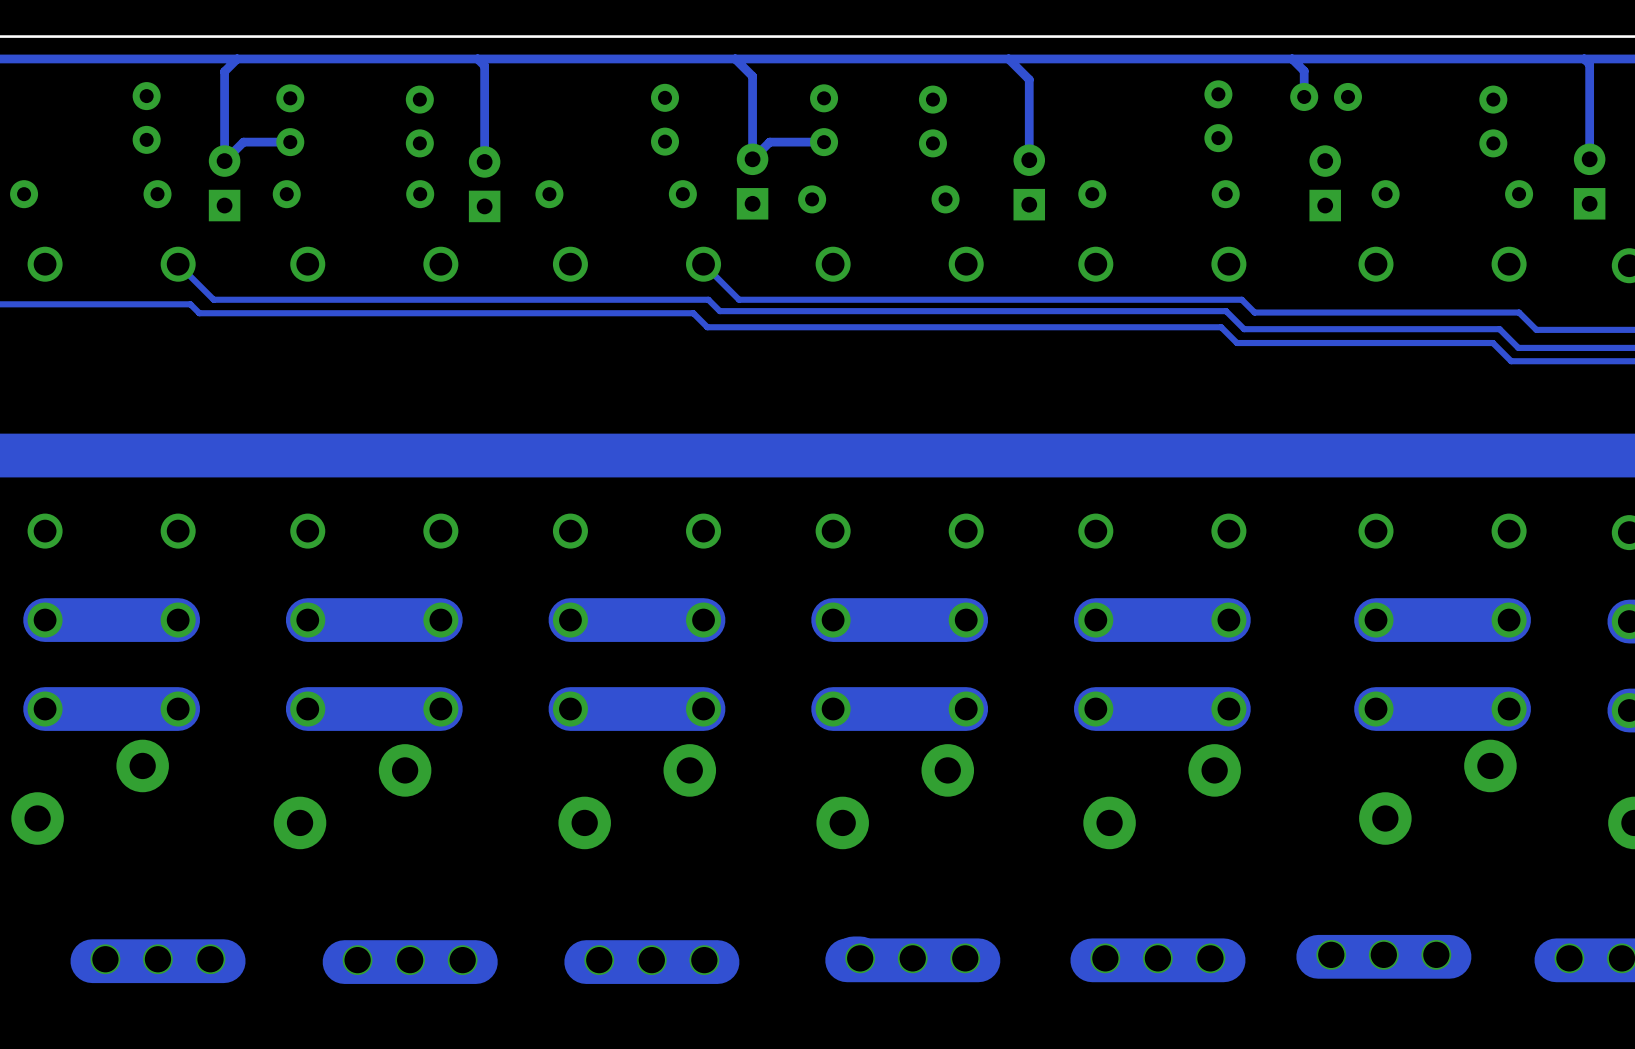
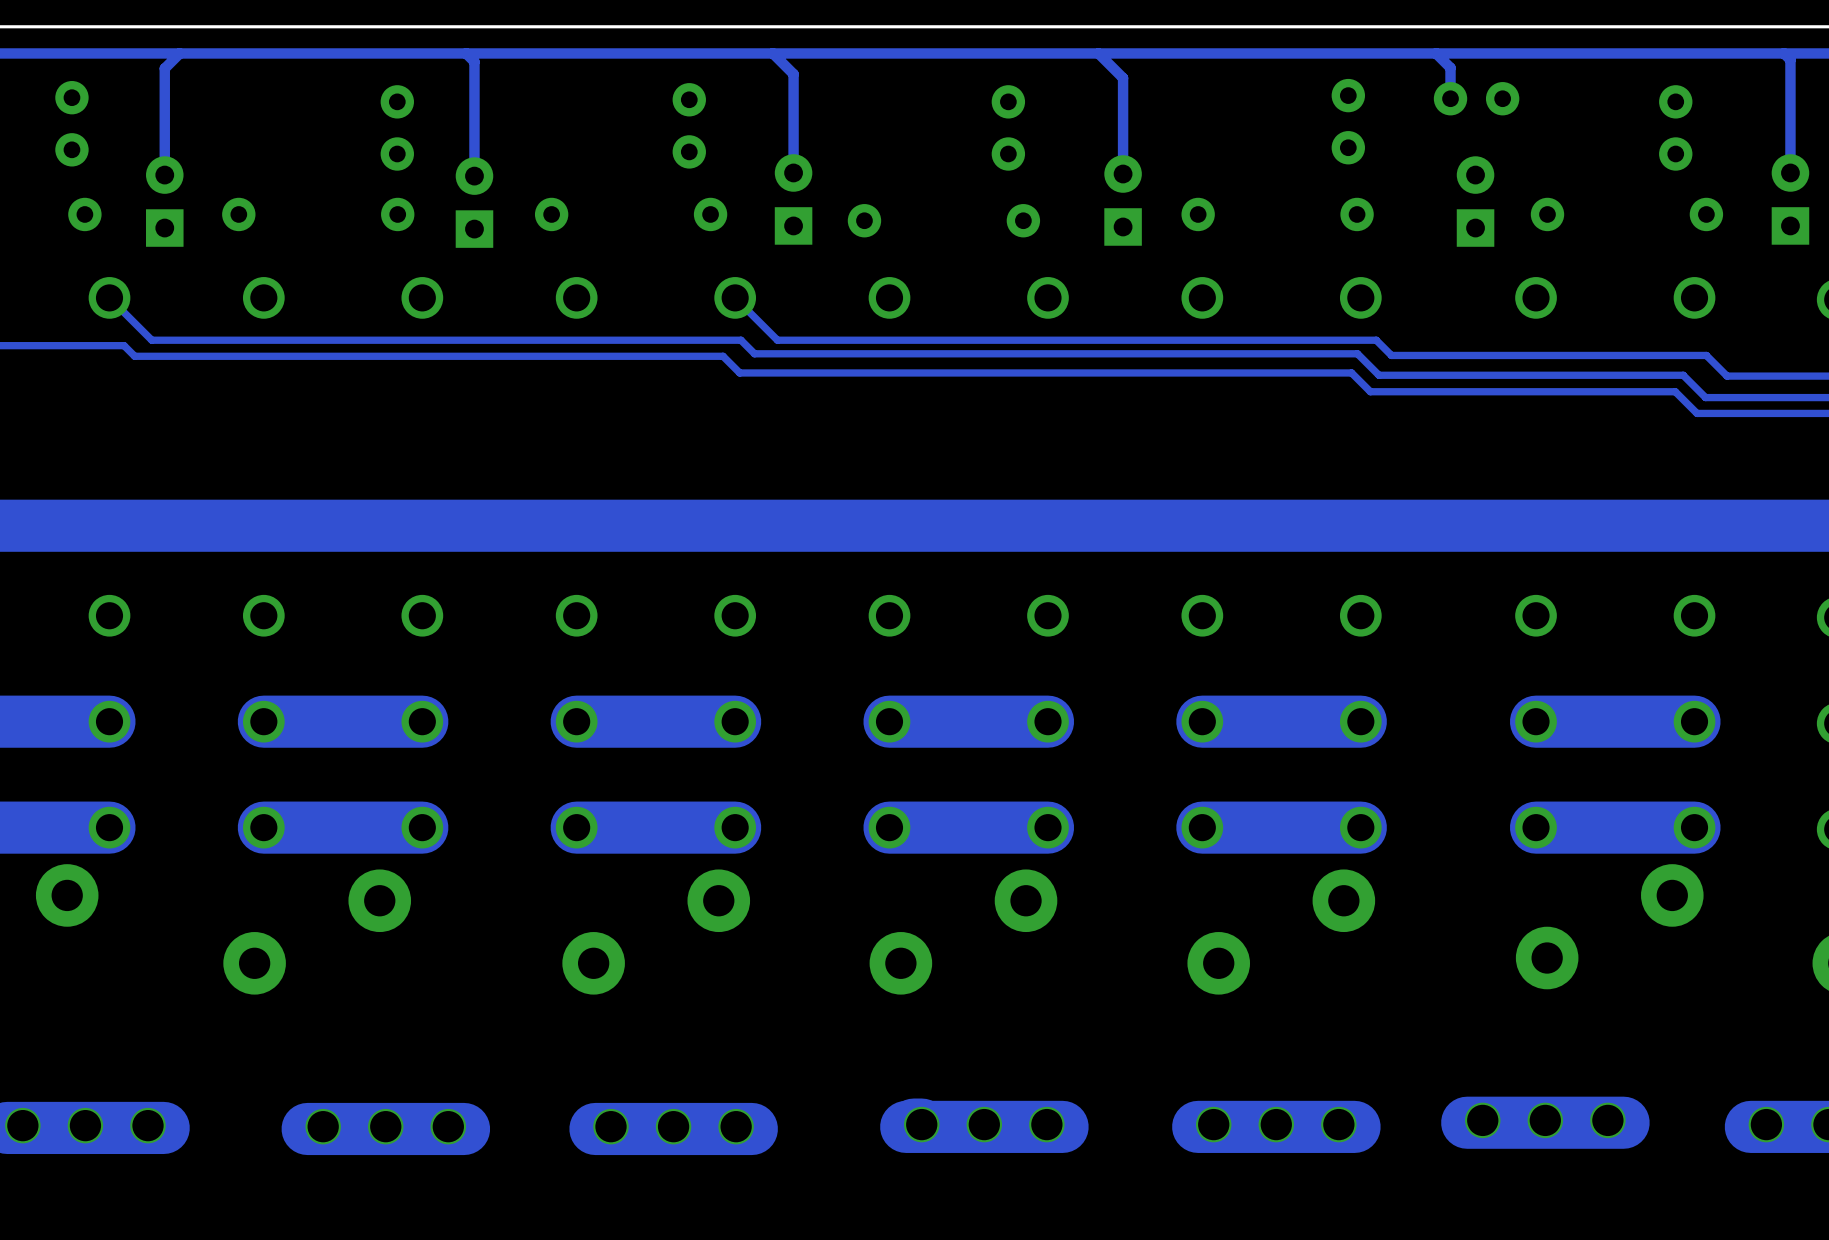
part: (290, 120) -> none
part: (824, 120) -> none
track: (290, 142) (243, 142) (224, 161) -> none
track: (824, 142) (769, 142) (752, 159) -> none

